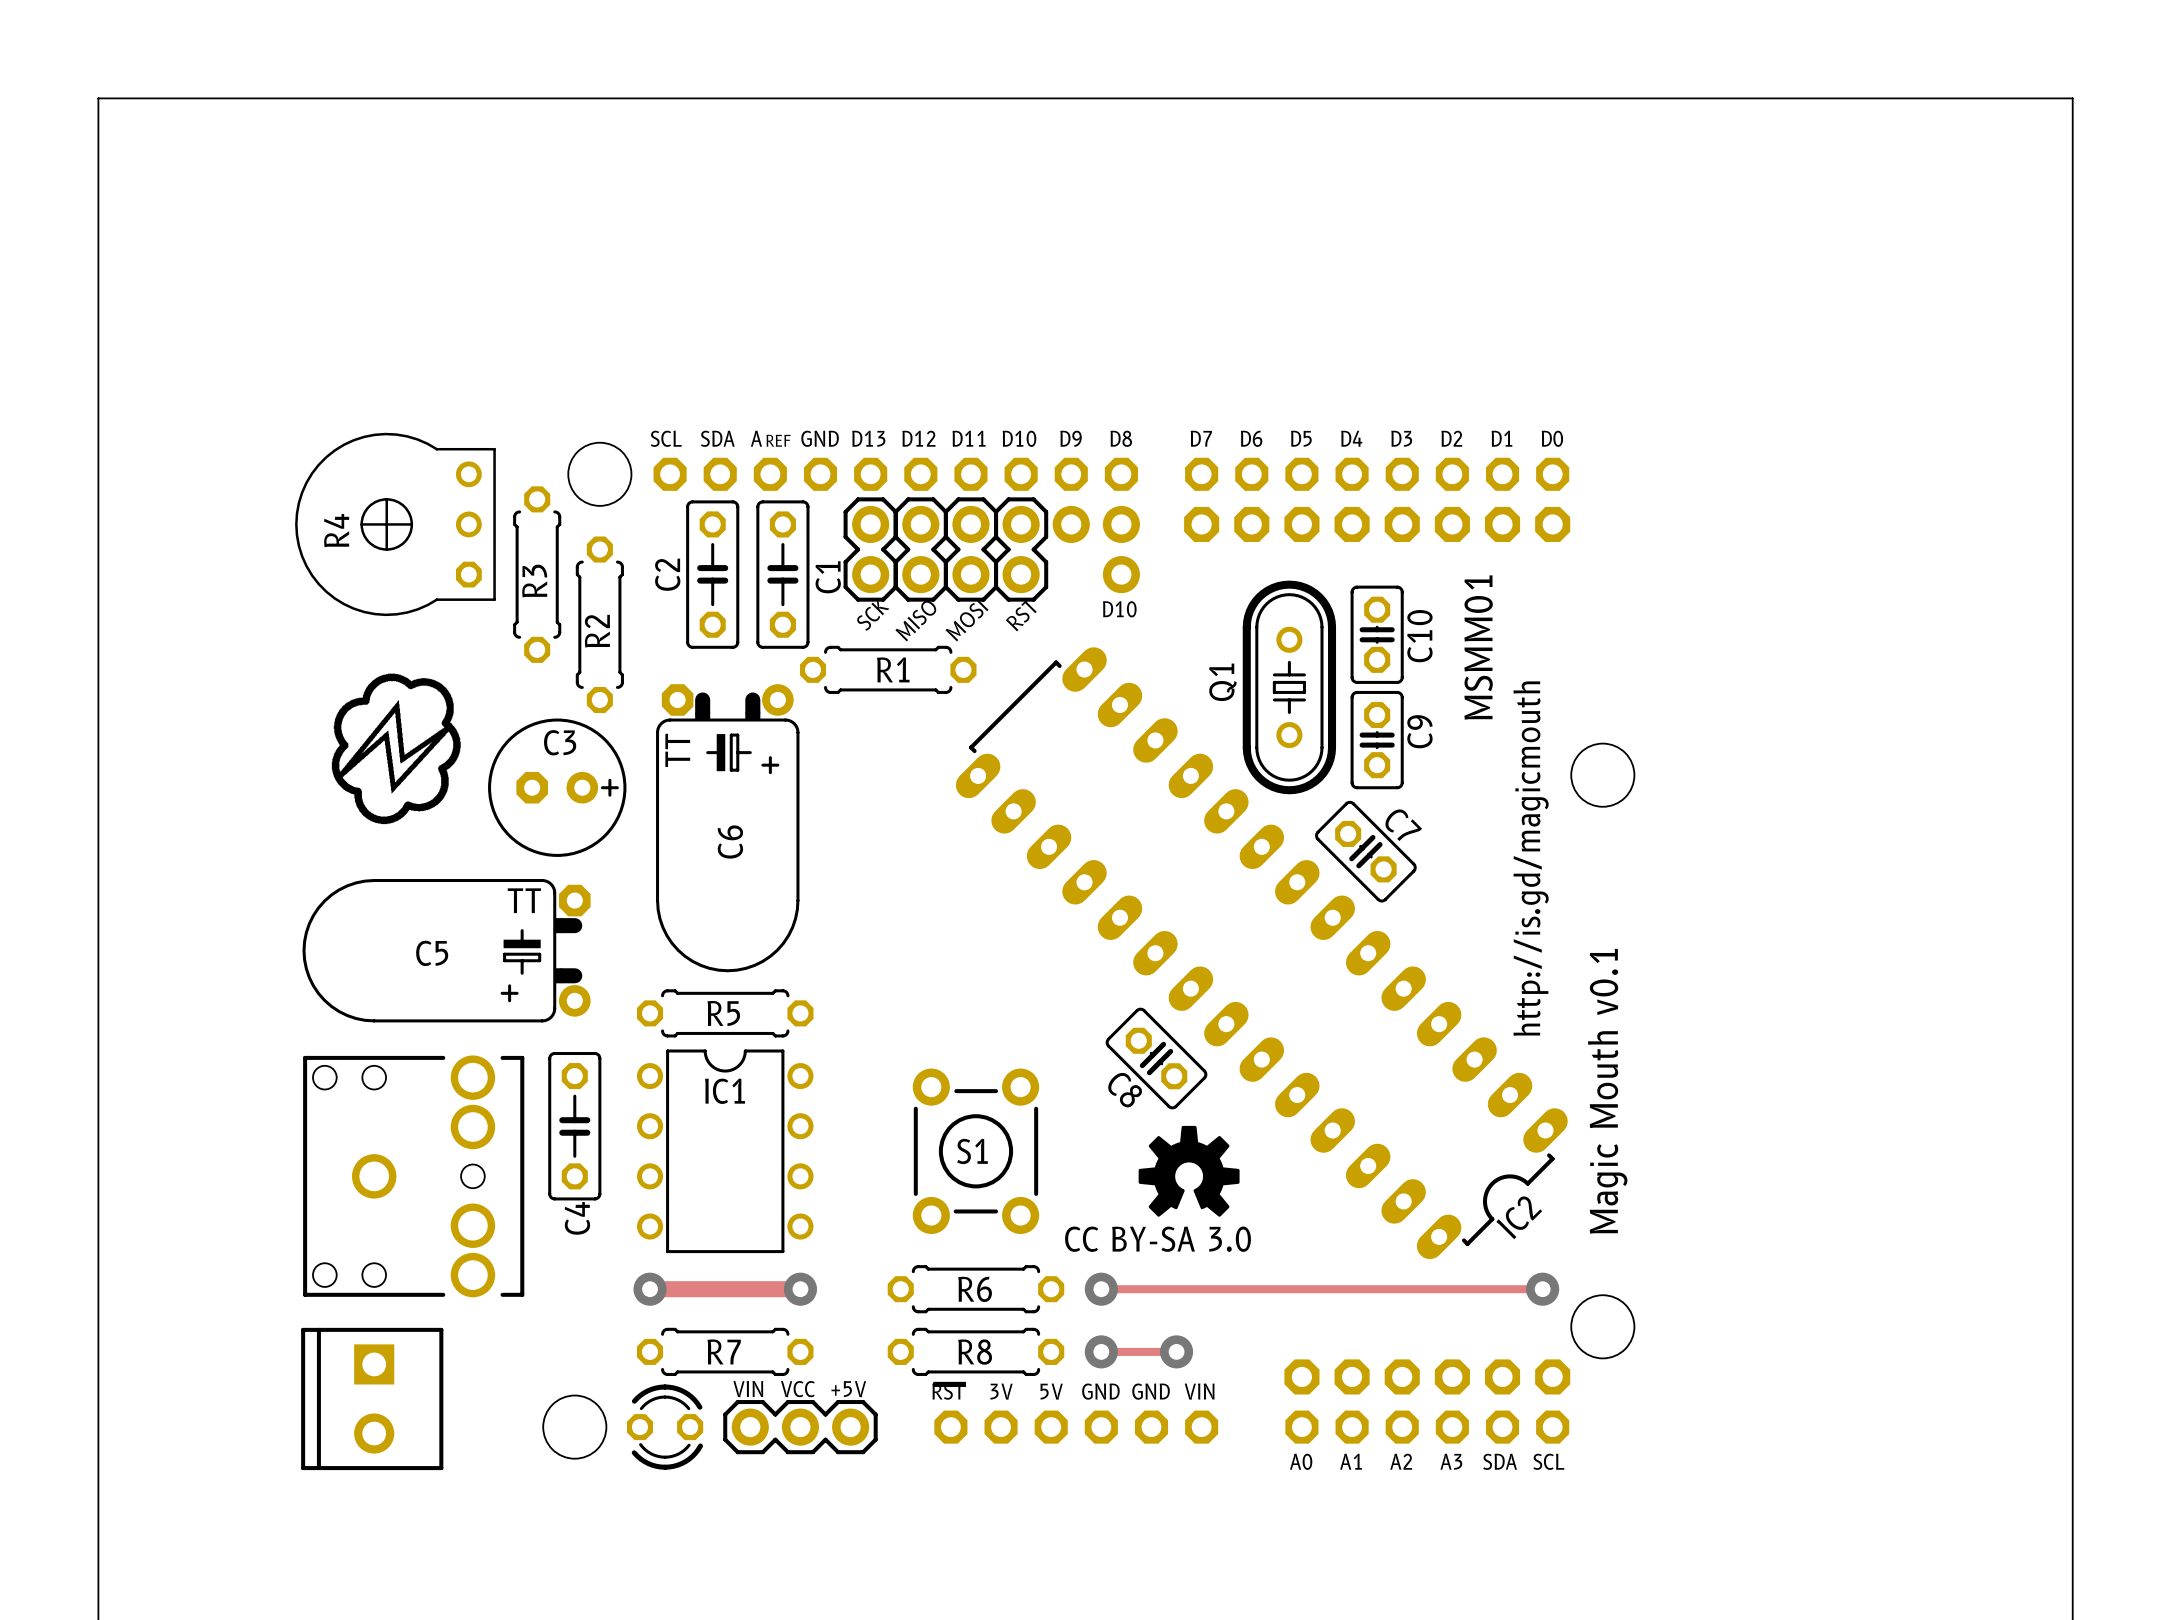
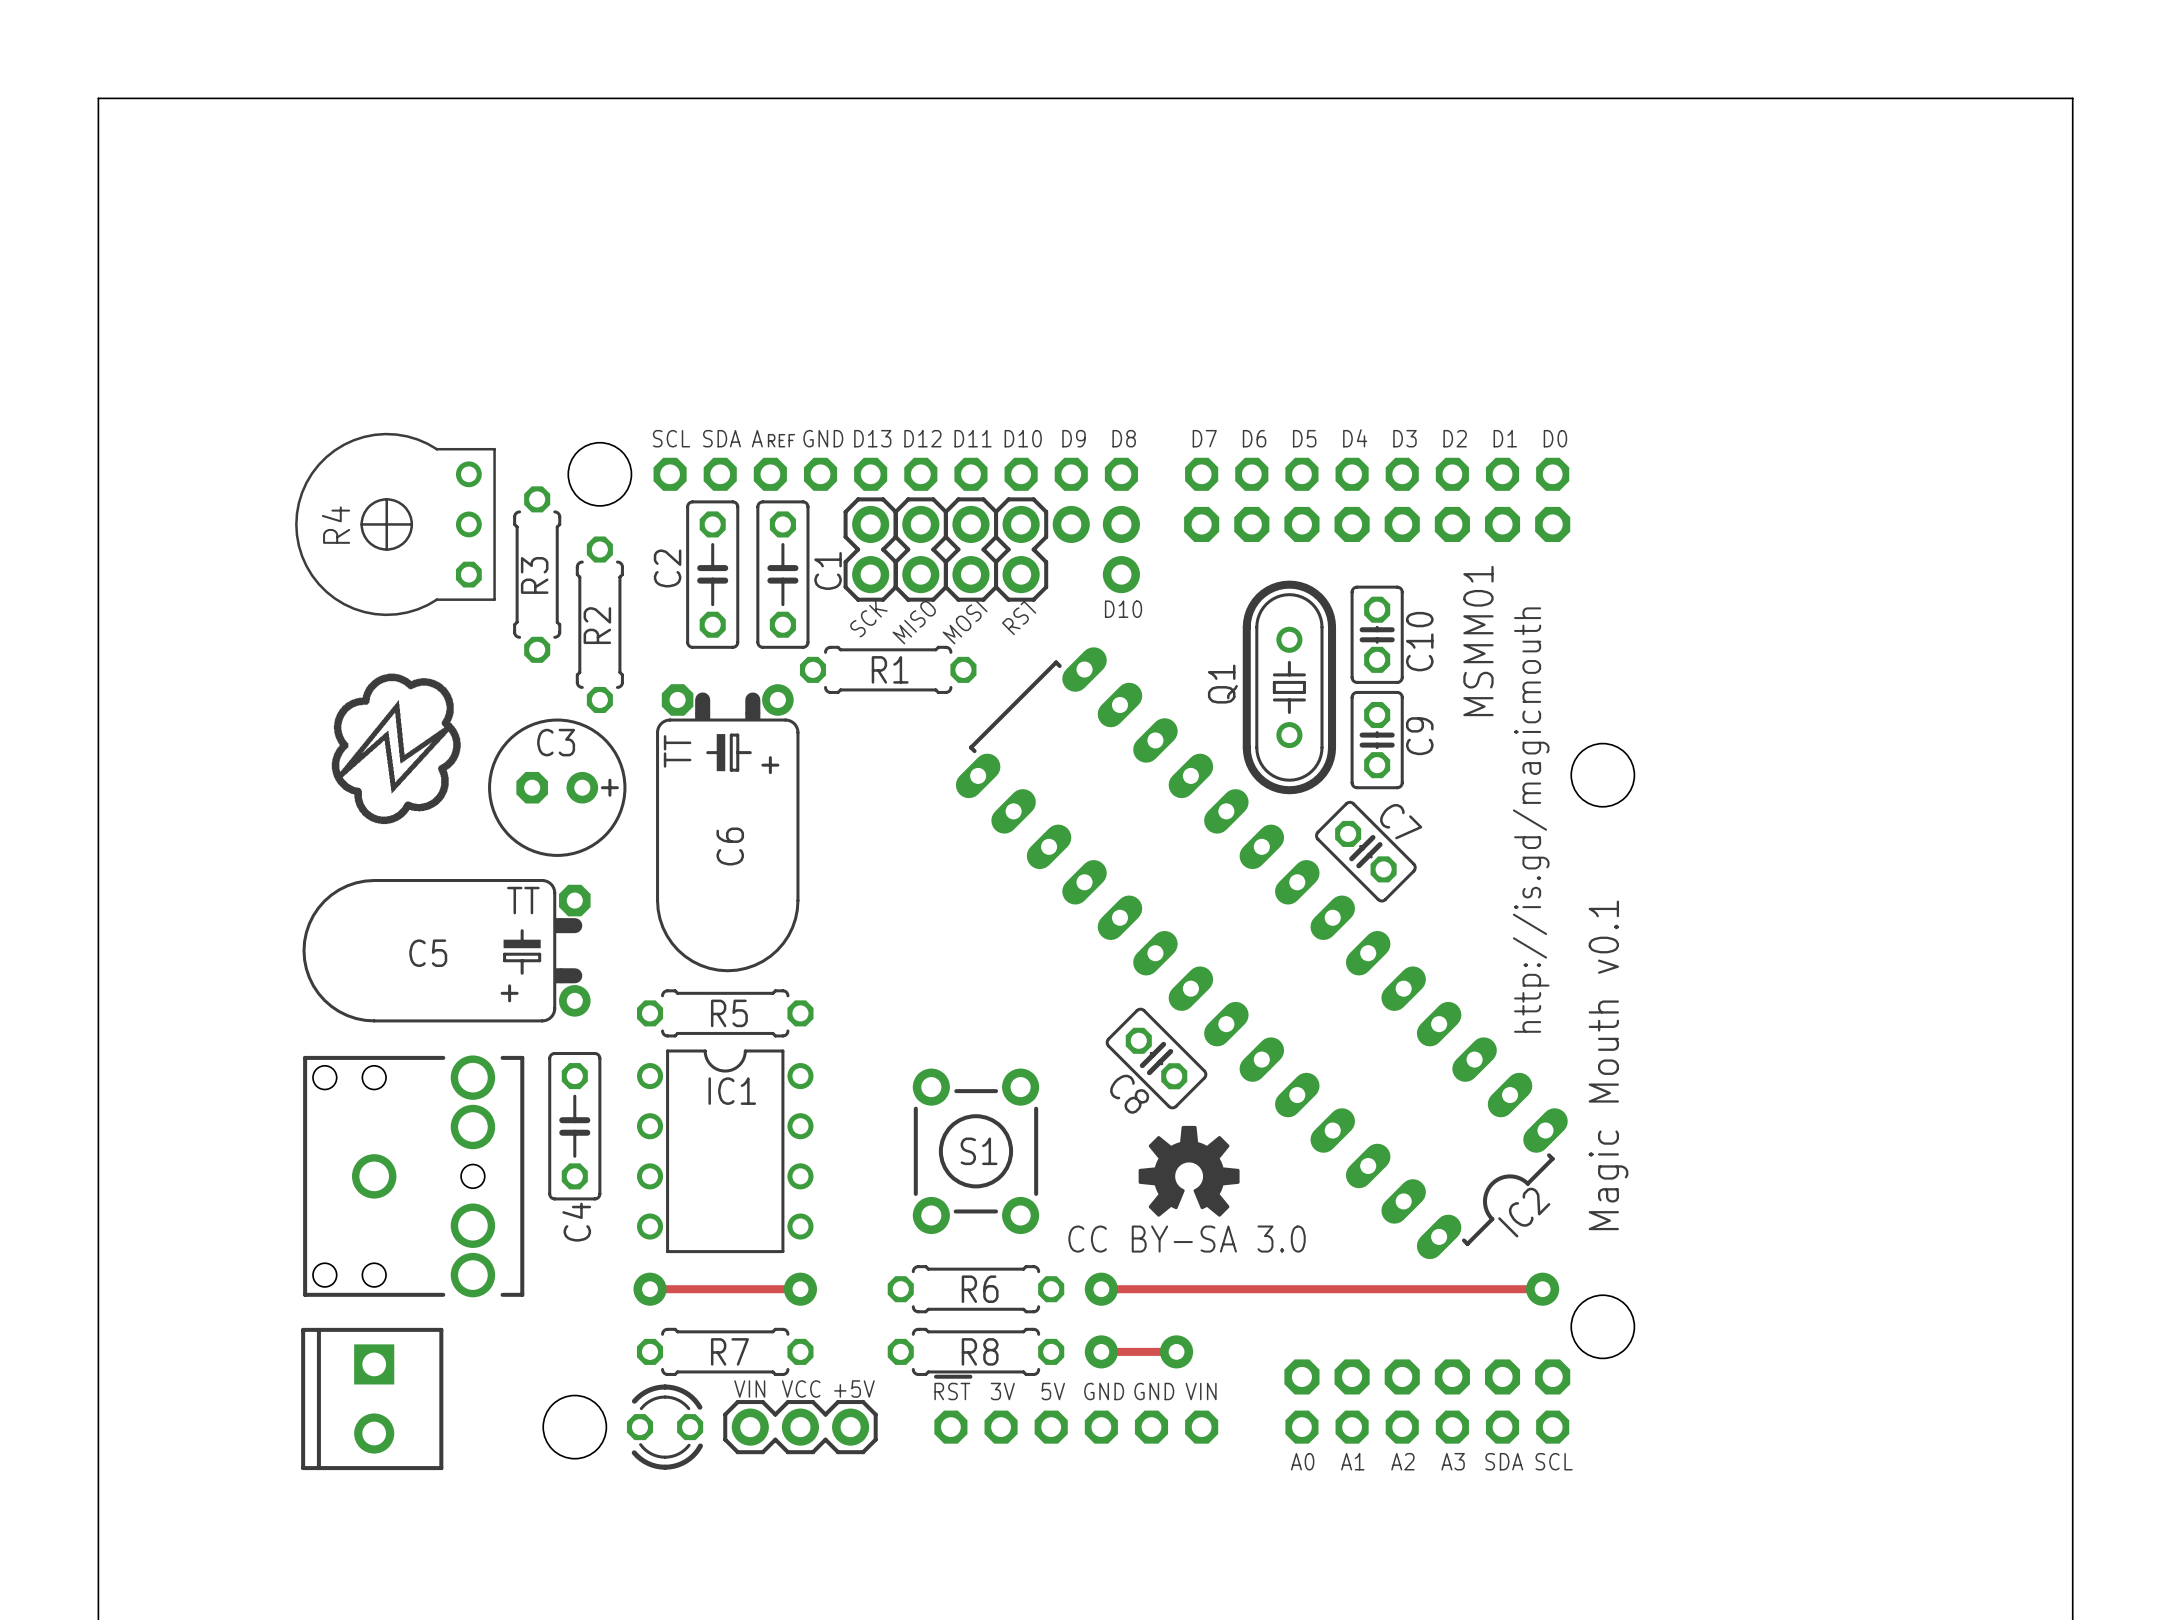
track width: thick (650, 1289) (800, 1289) -> thin (650, 1289) (800, 1289)

